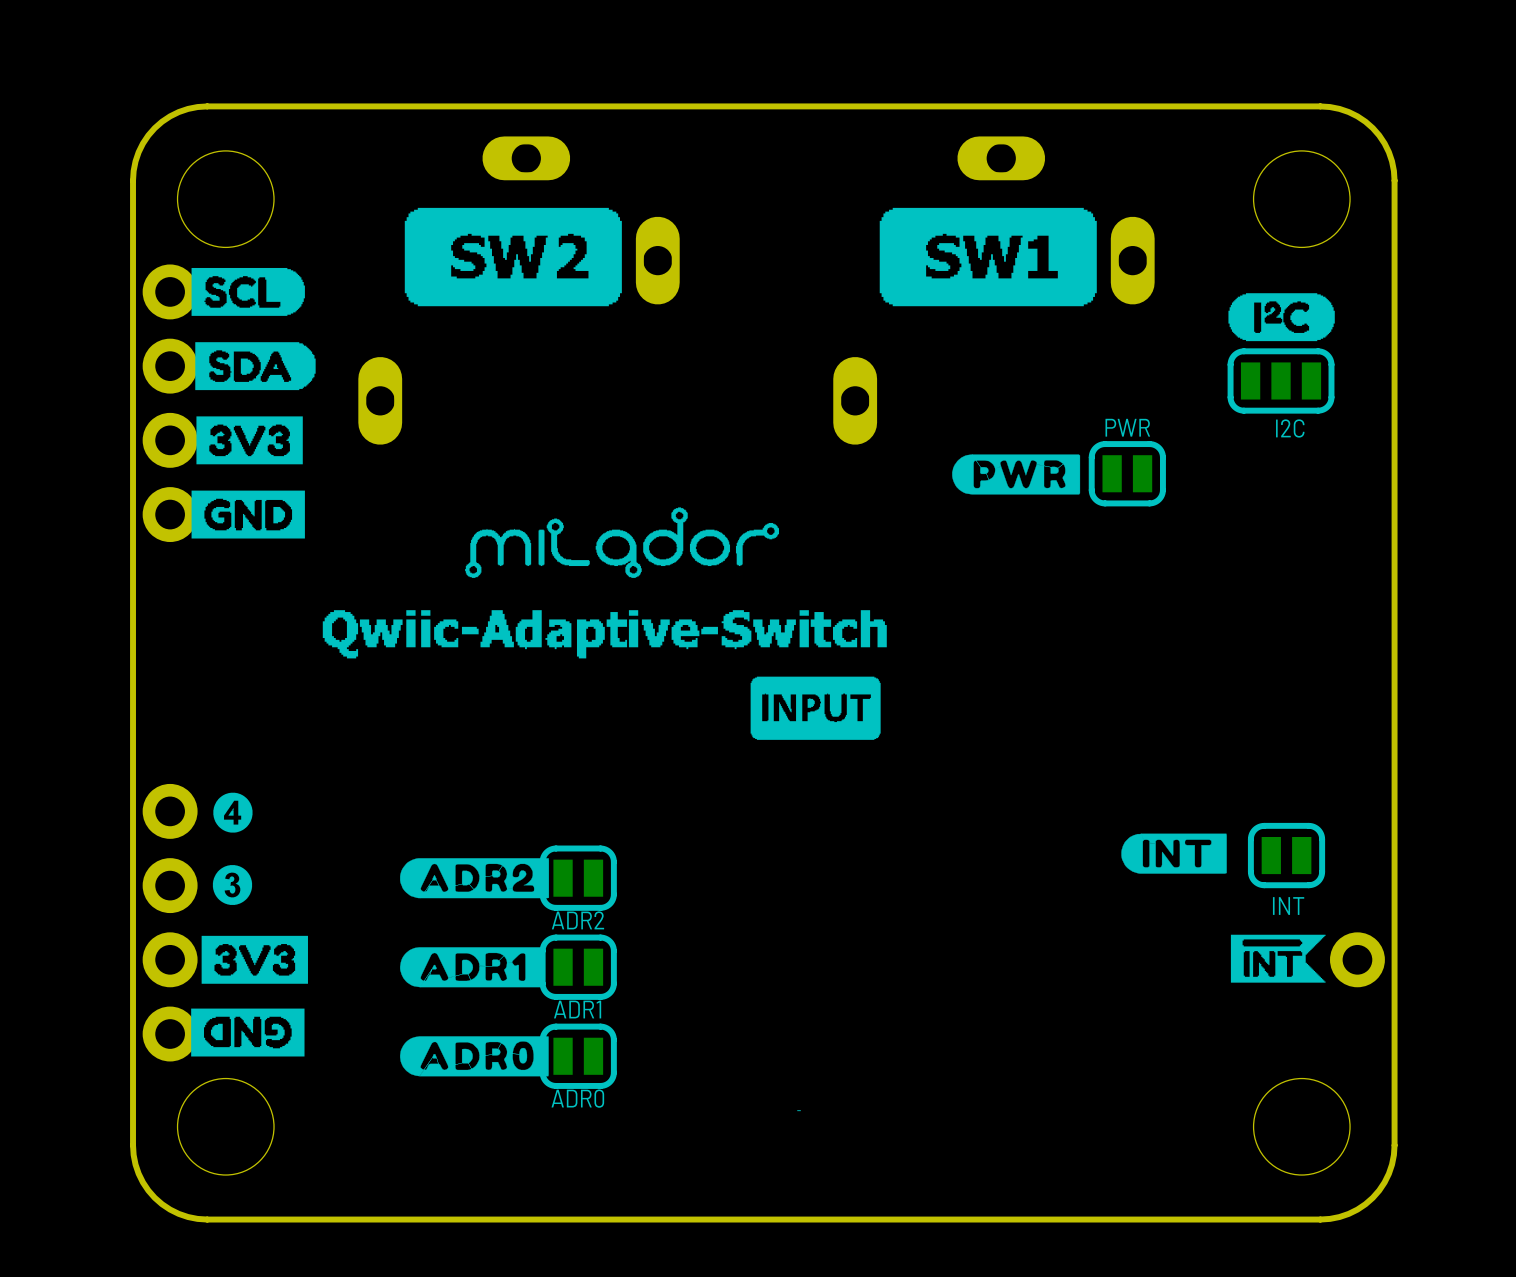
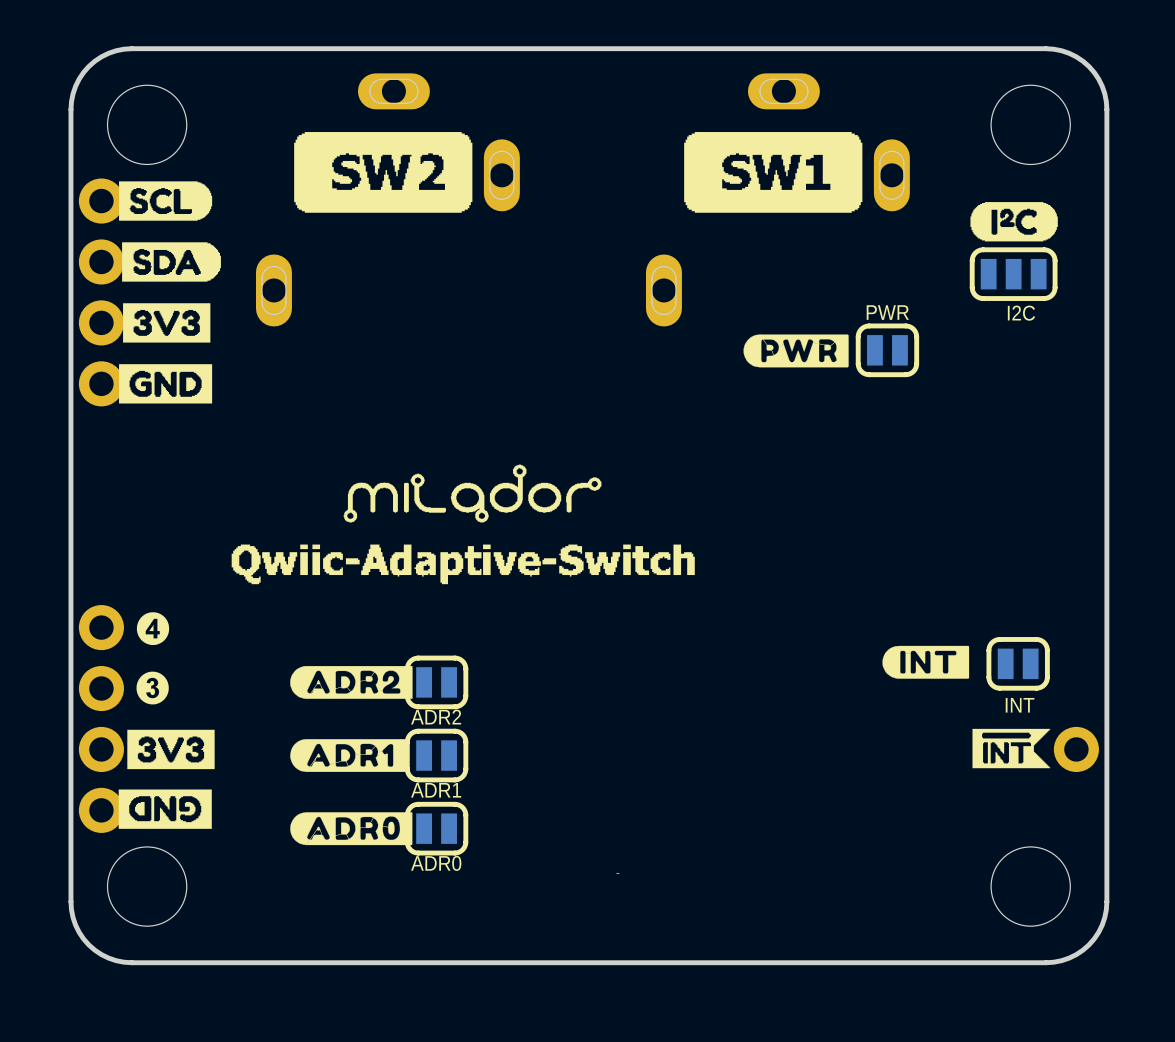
drawing position: (622, 542) -> (472, 493)
drawing position: (604, 634) -> (463, 564)
drawing: [750, 676, 881, 740] -> none

